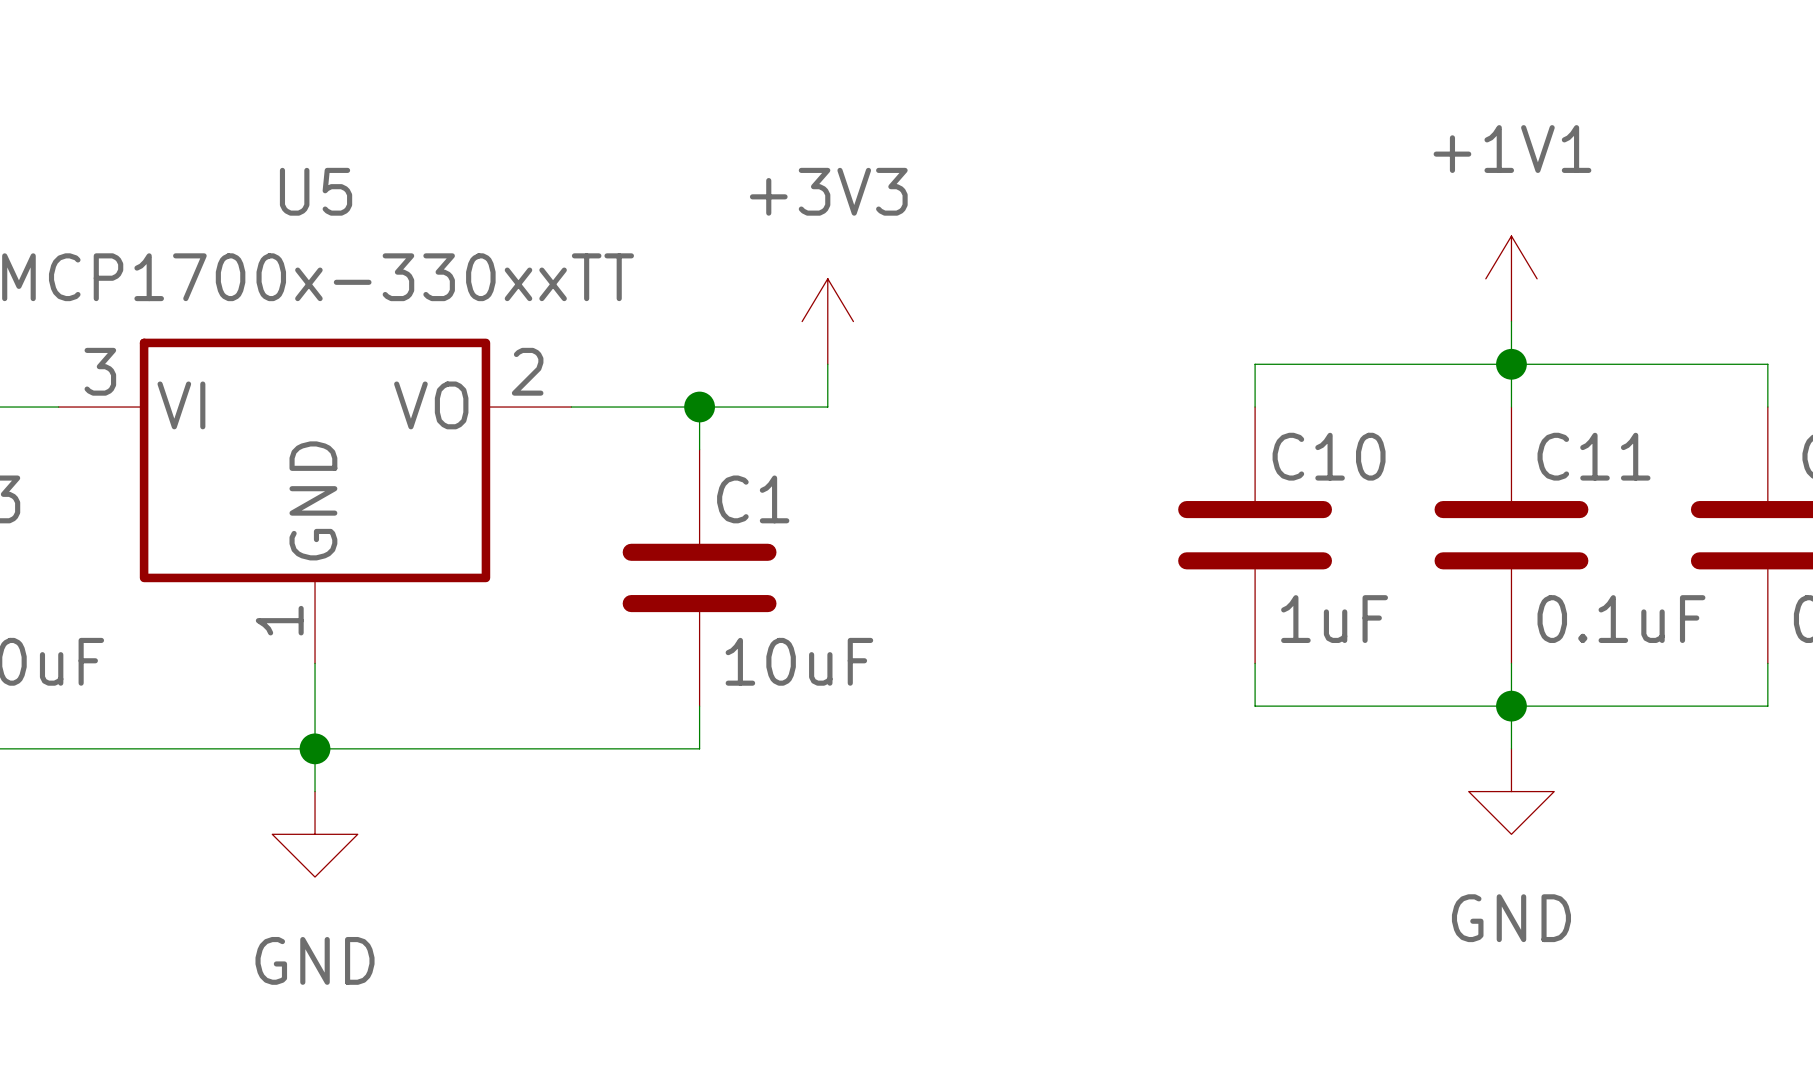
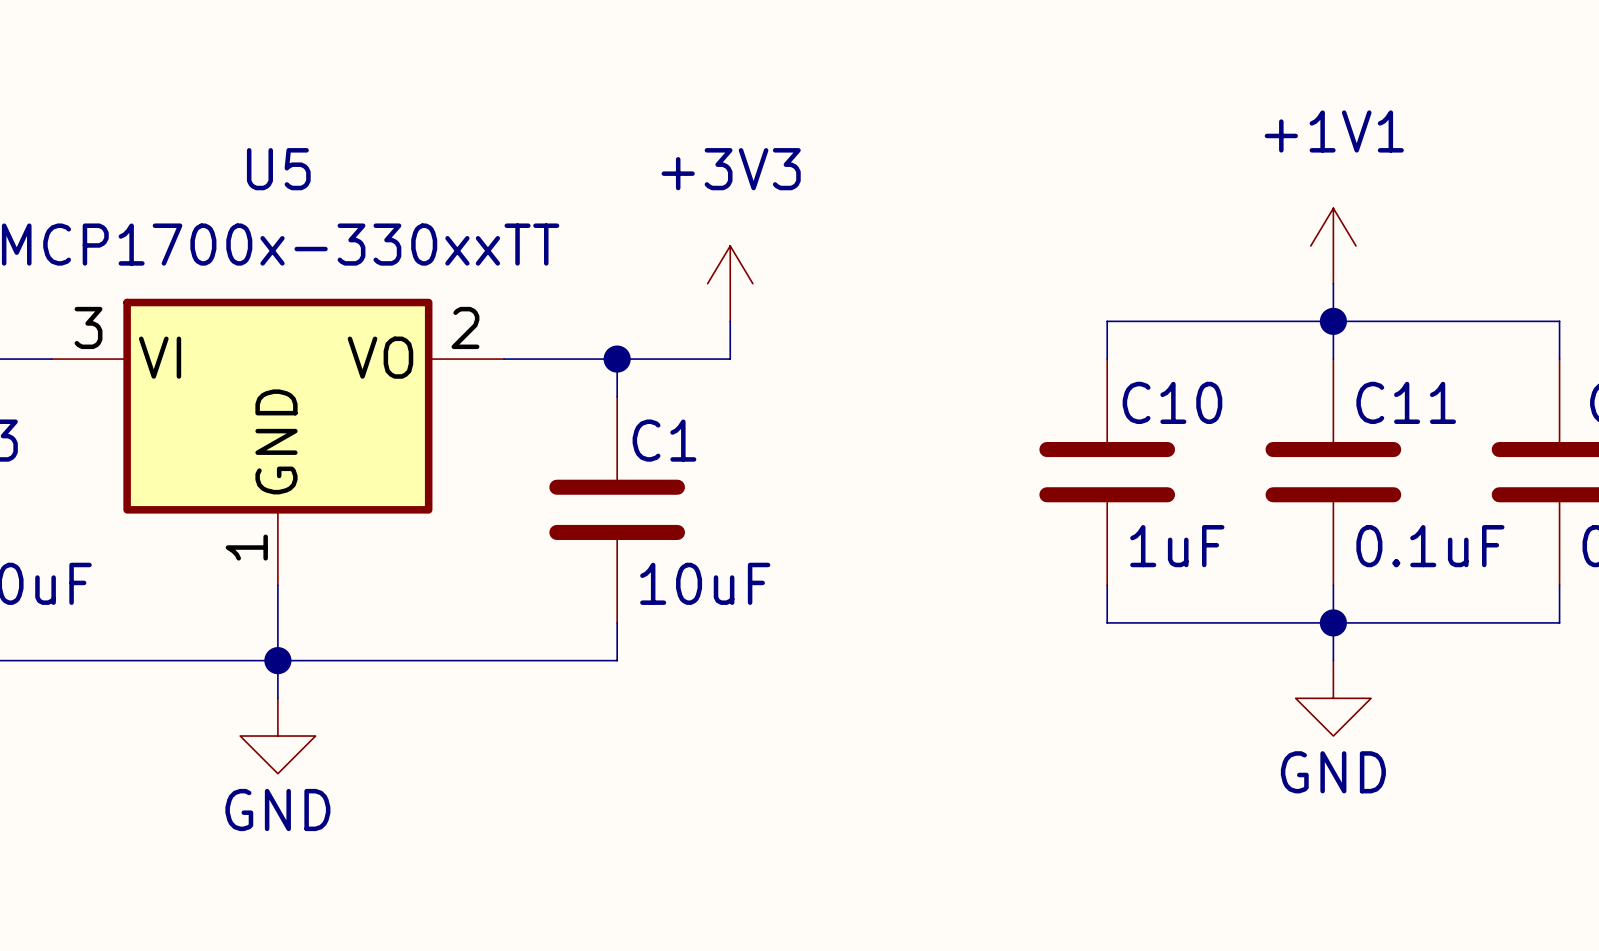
power symbol text position: GND (1511, 918) -> GND (1333, 772)
power symbol text position: GND (315, 960) -> GND (277, 810)

